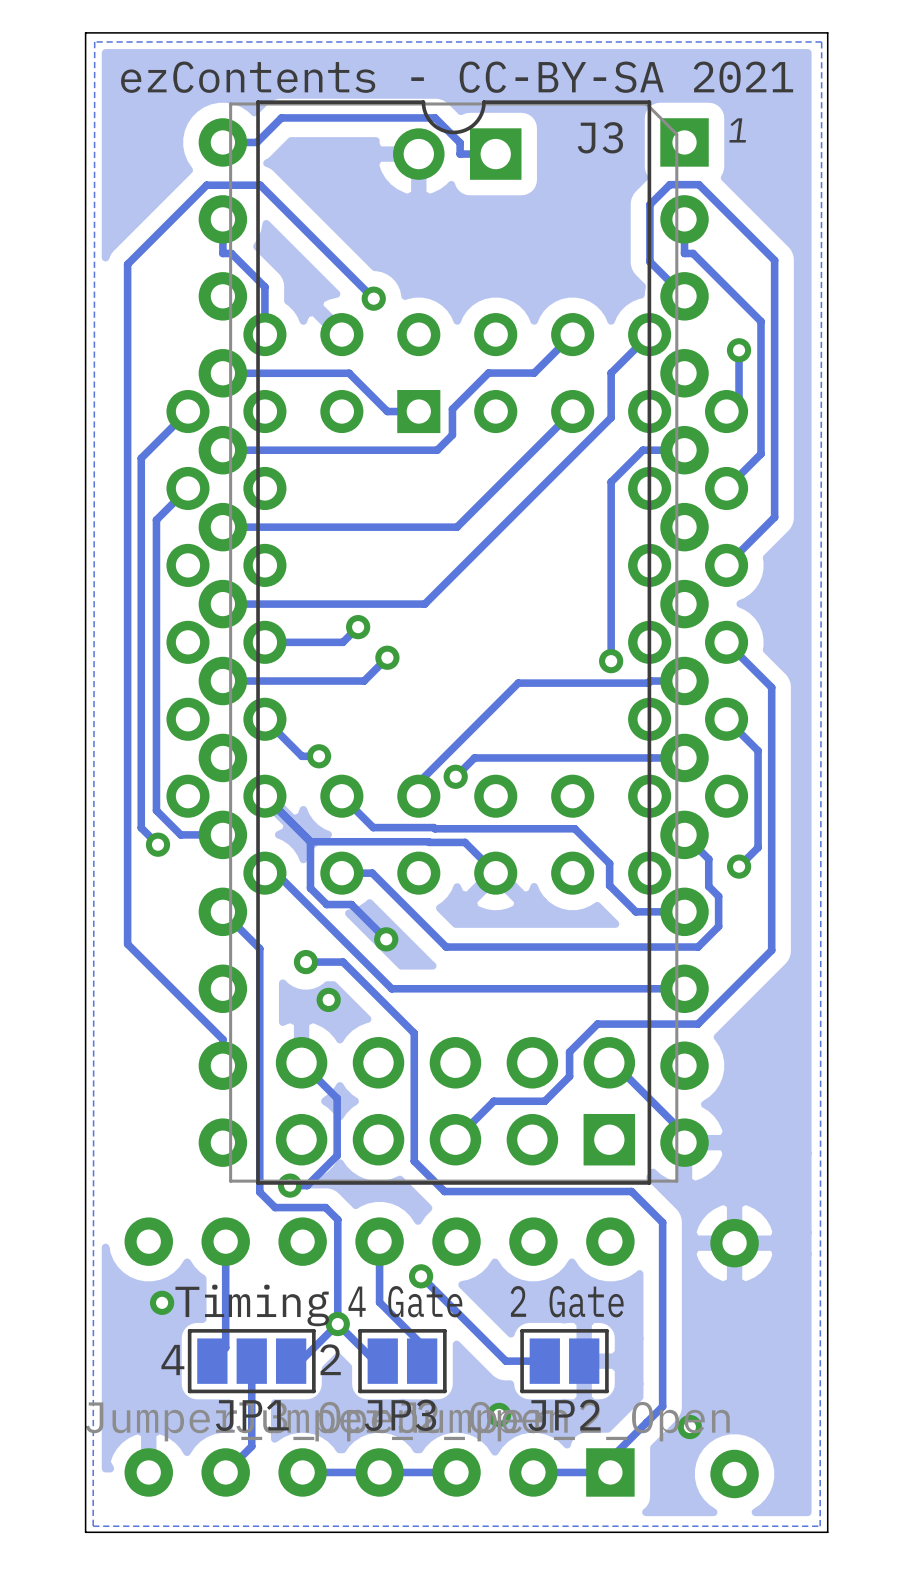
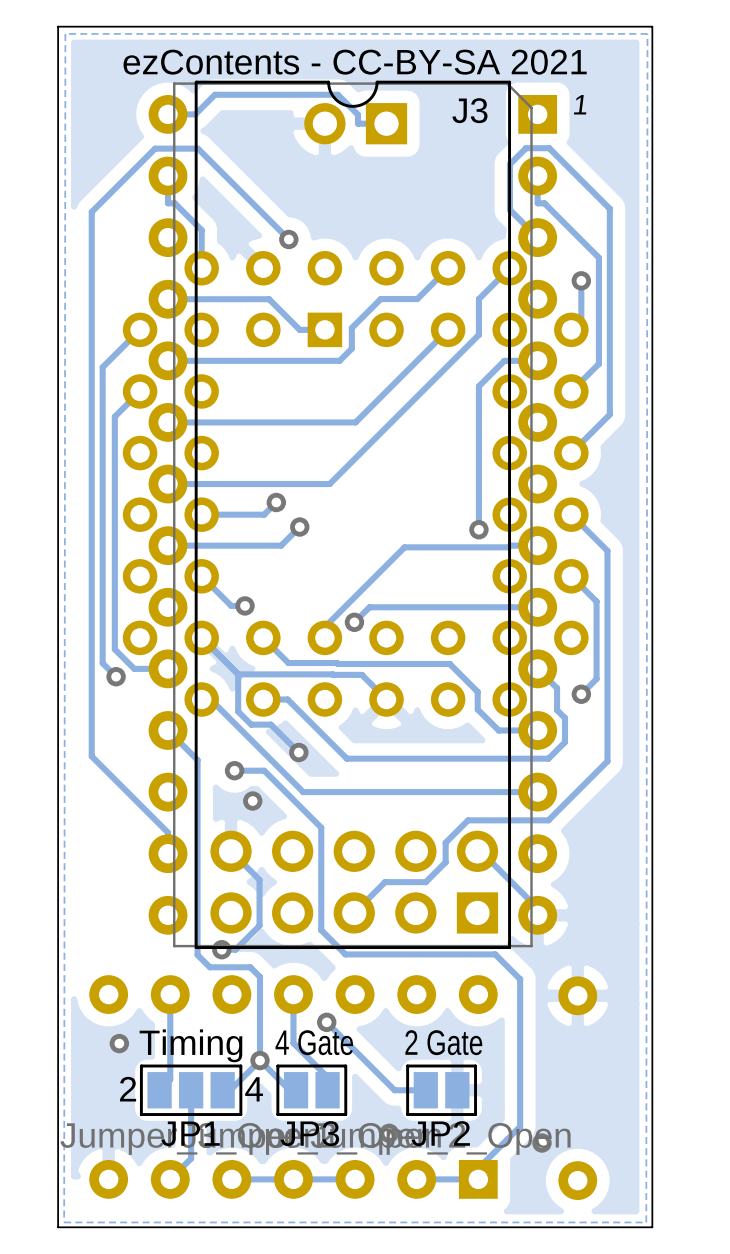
JP1 rotation: 0° (251, 1361) -> 180° (191, 1090)

